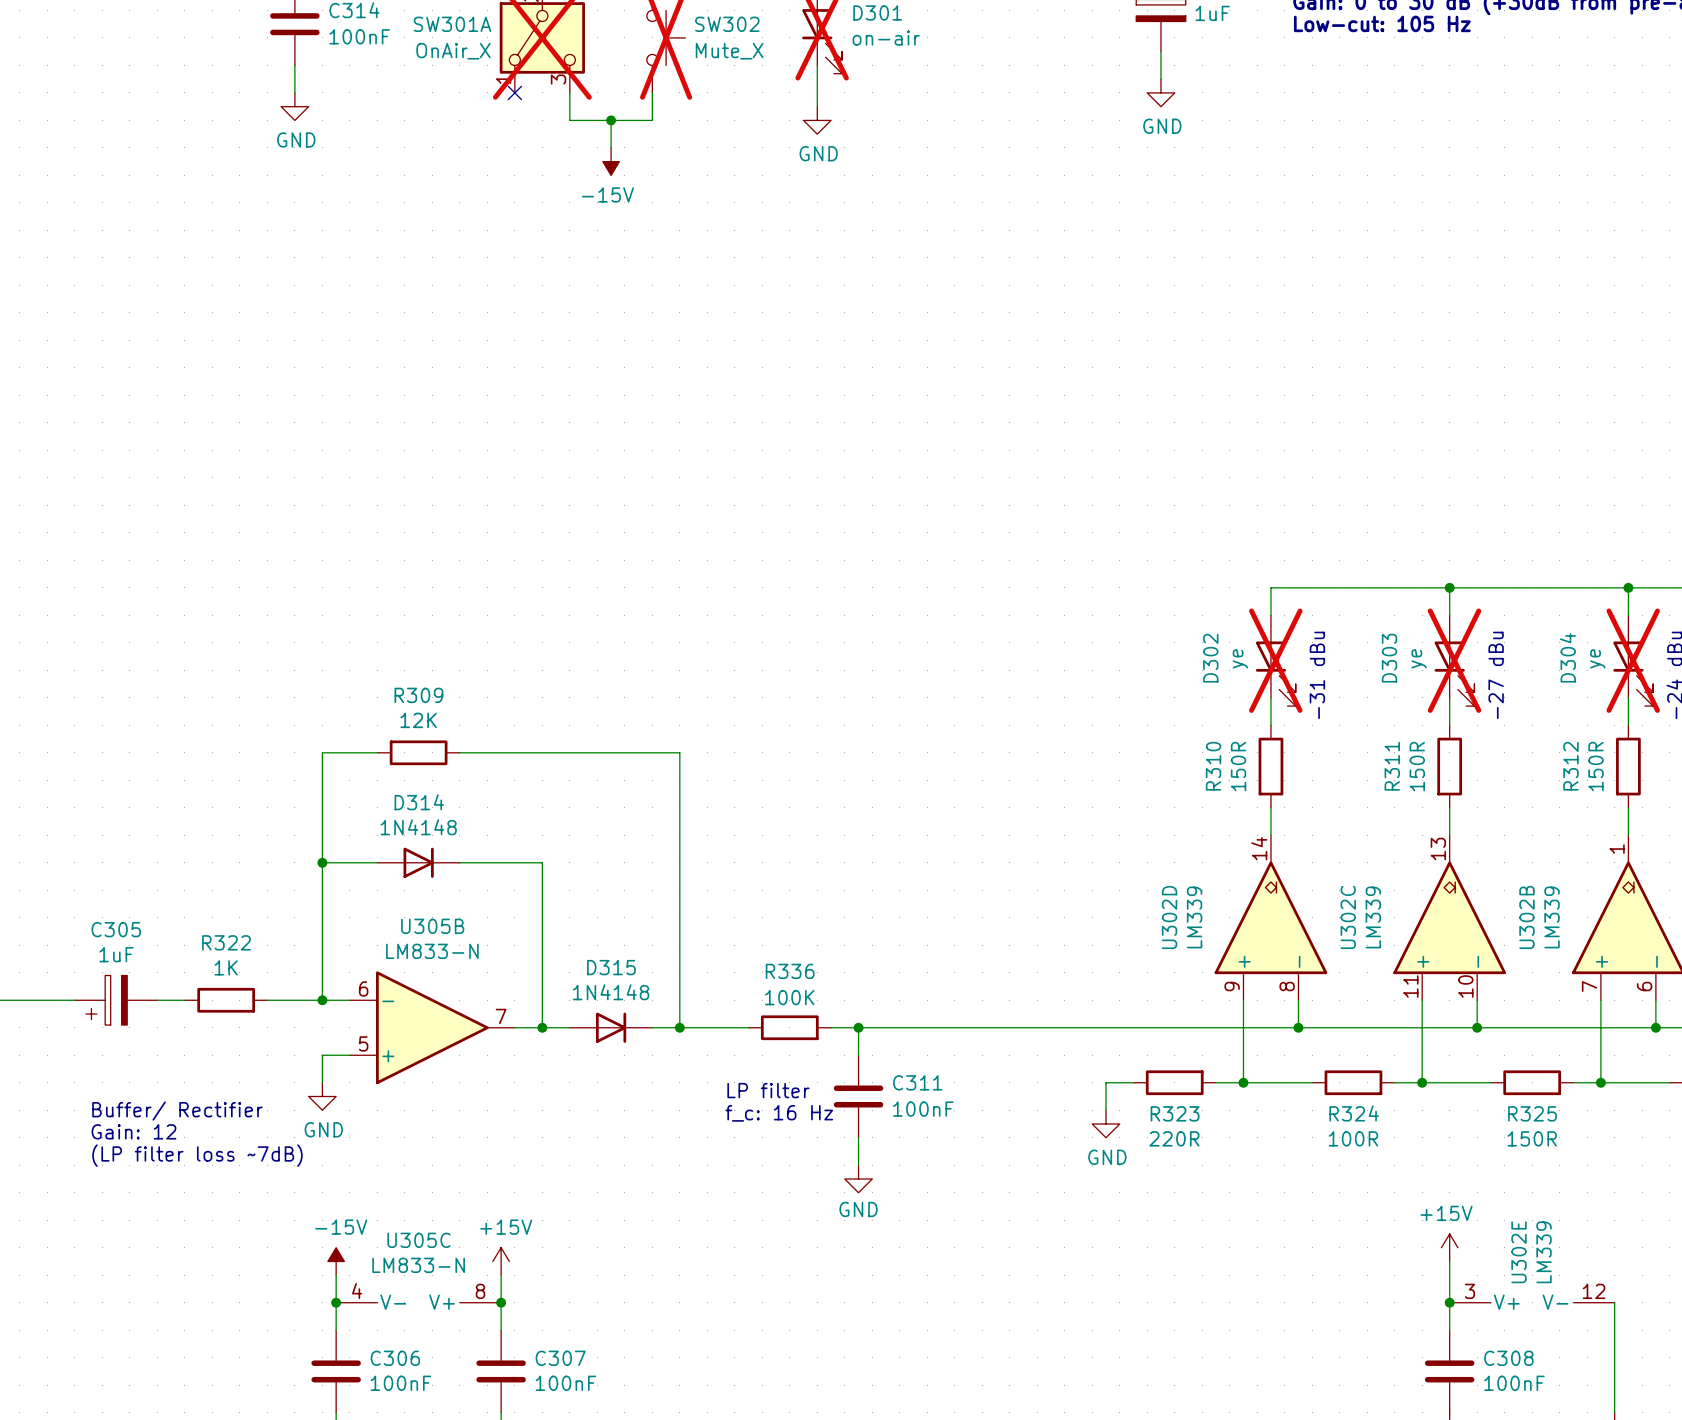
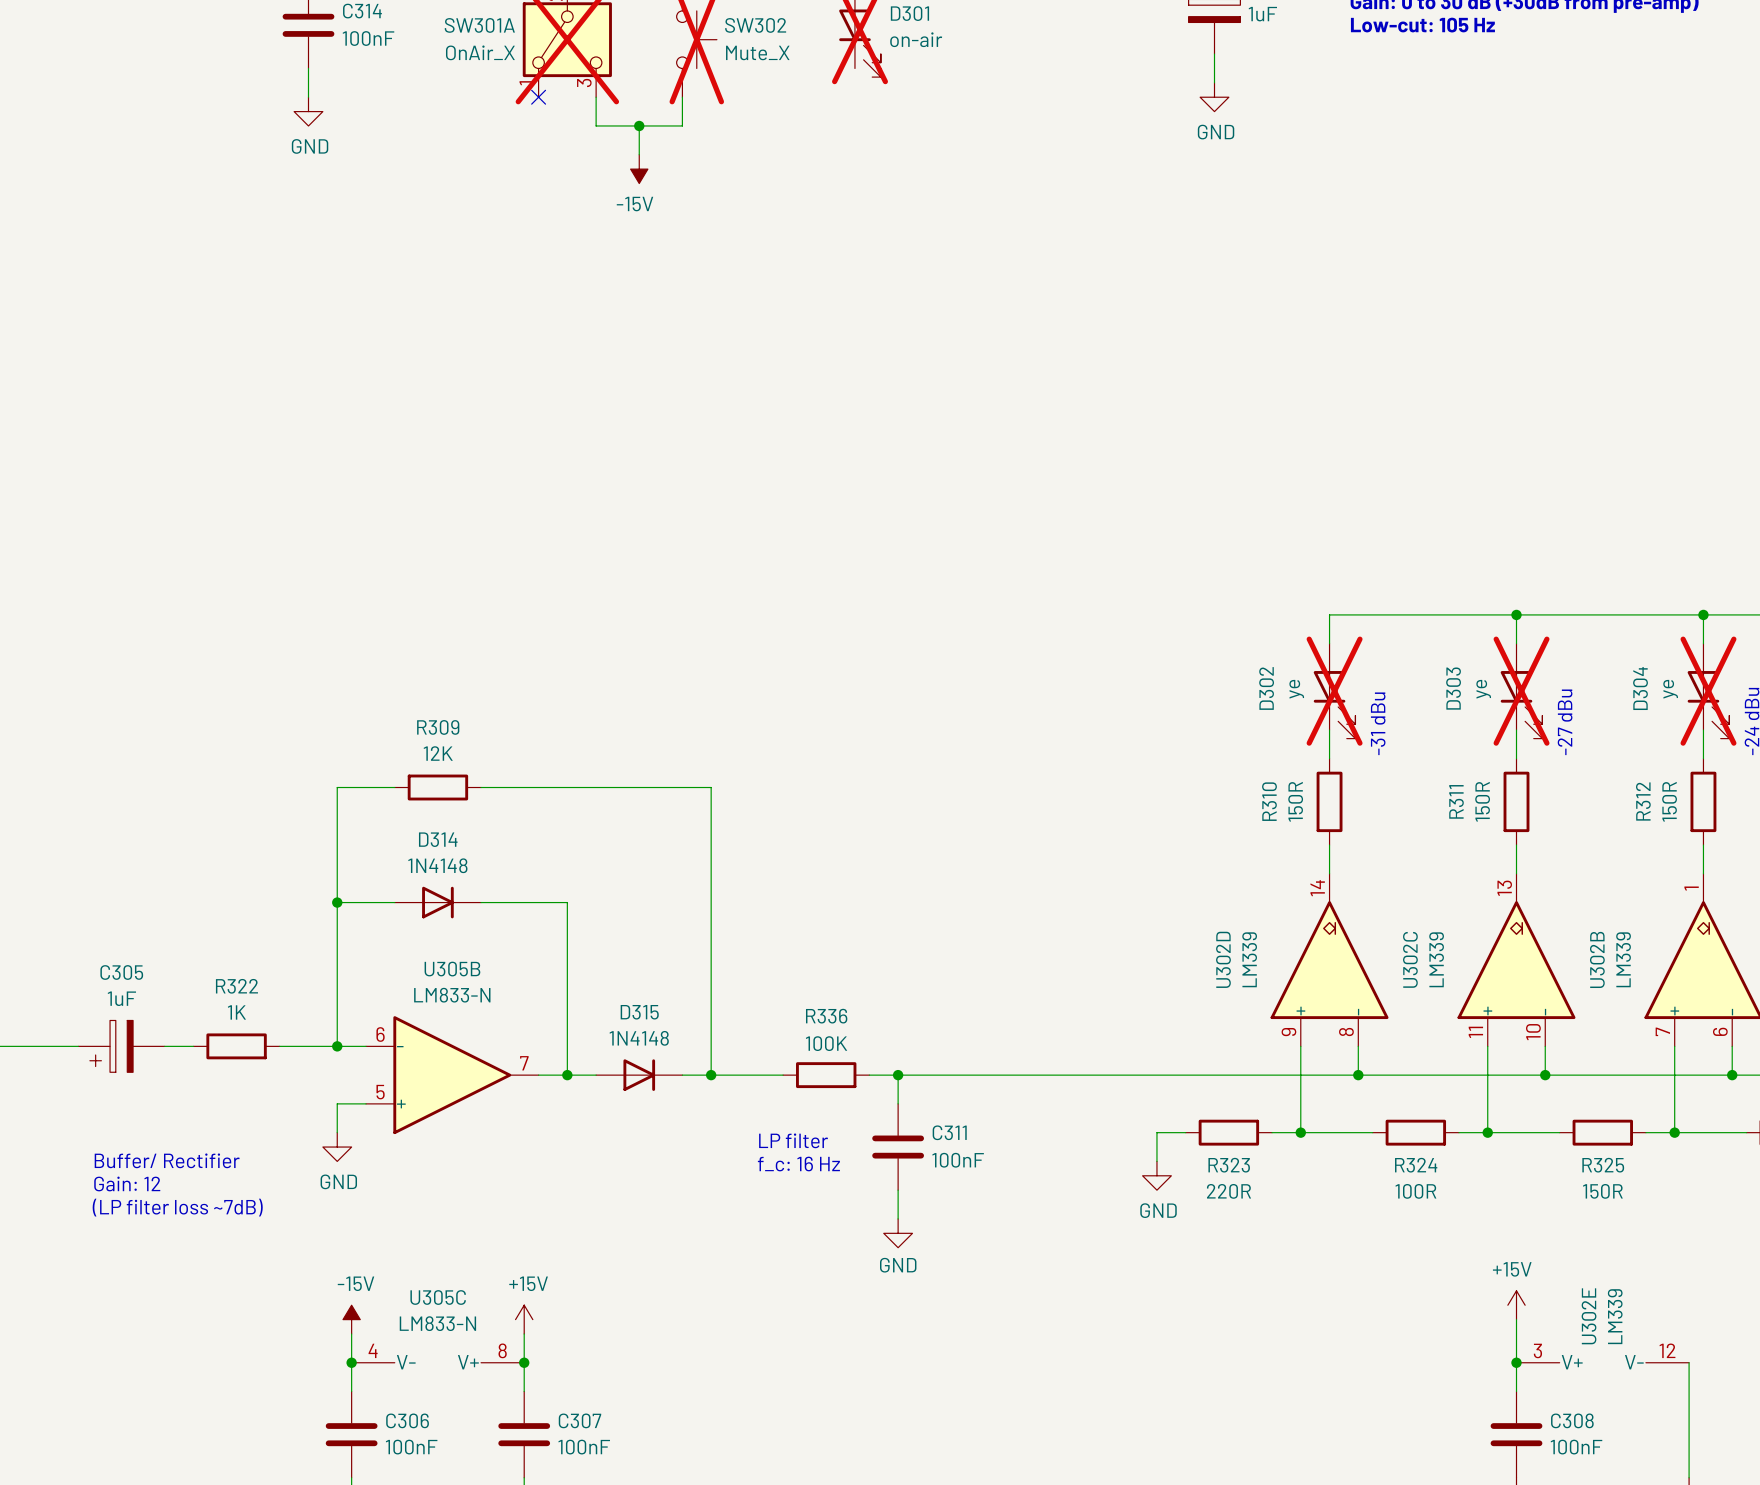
wire: (817, 65) (817, 106) -> none
power symbol: GND (817, 120) -> none

